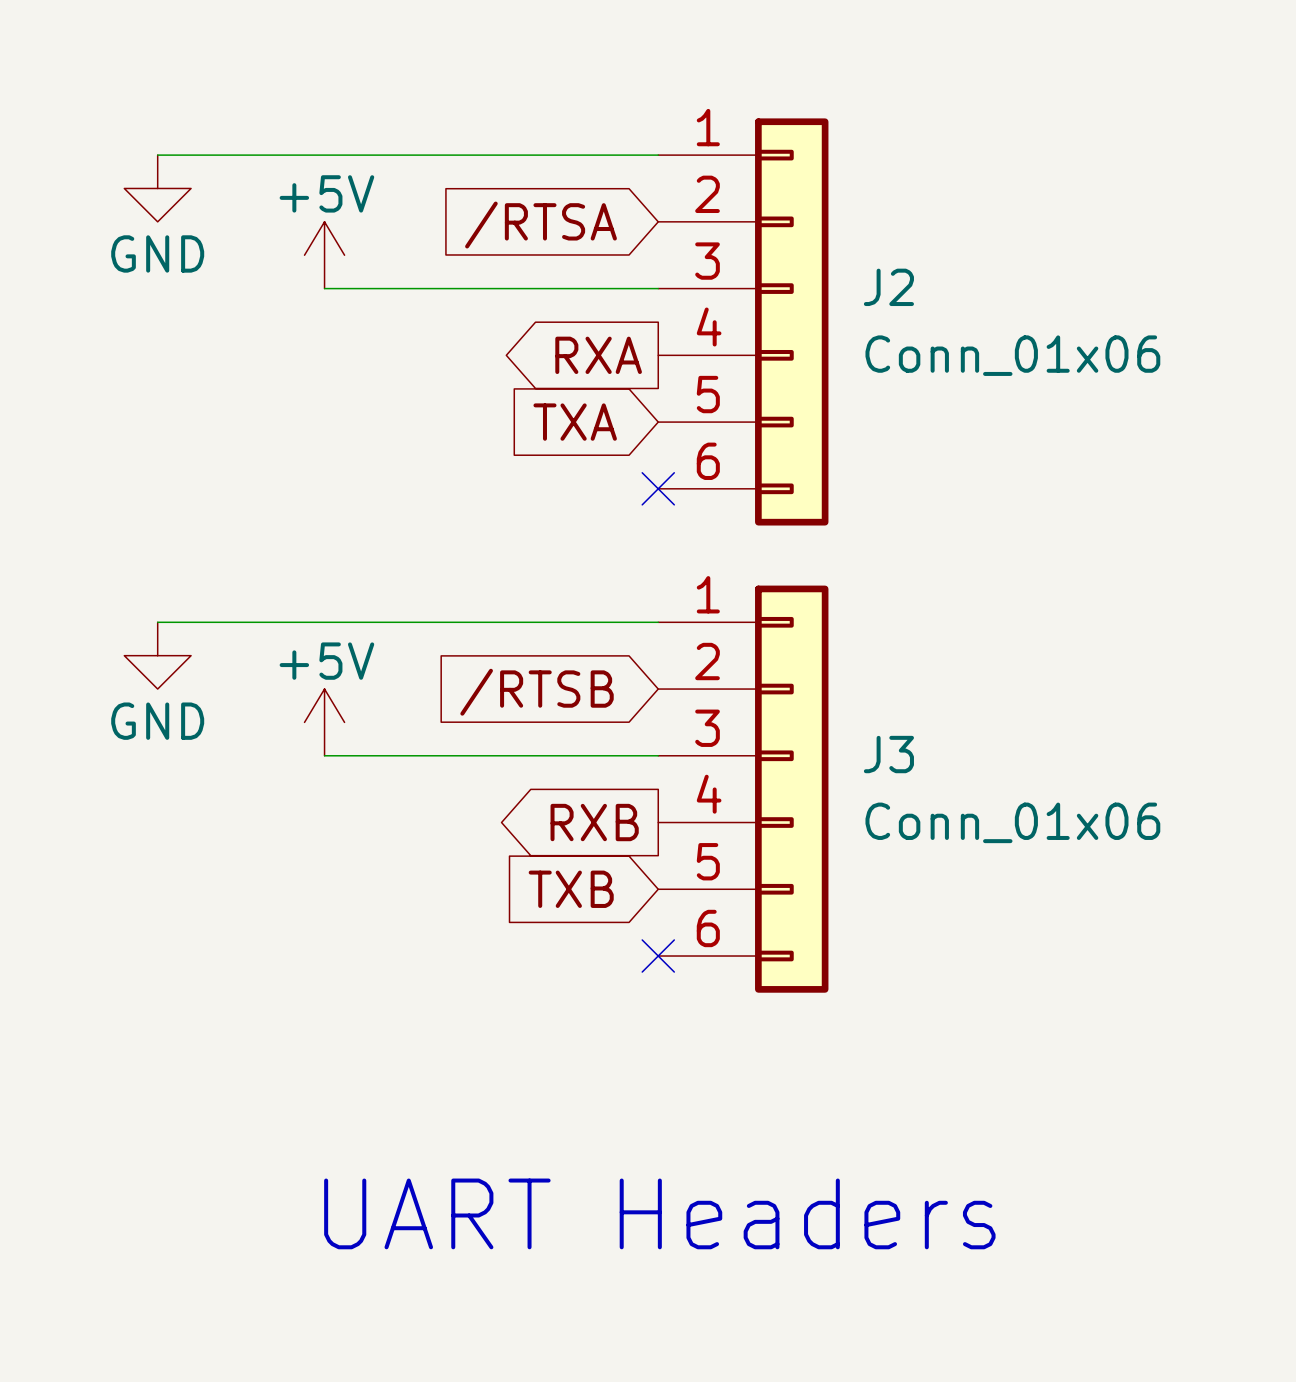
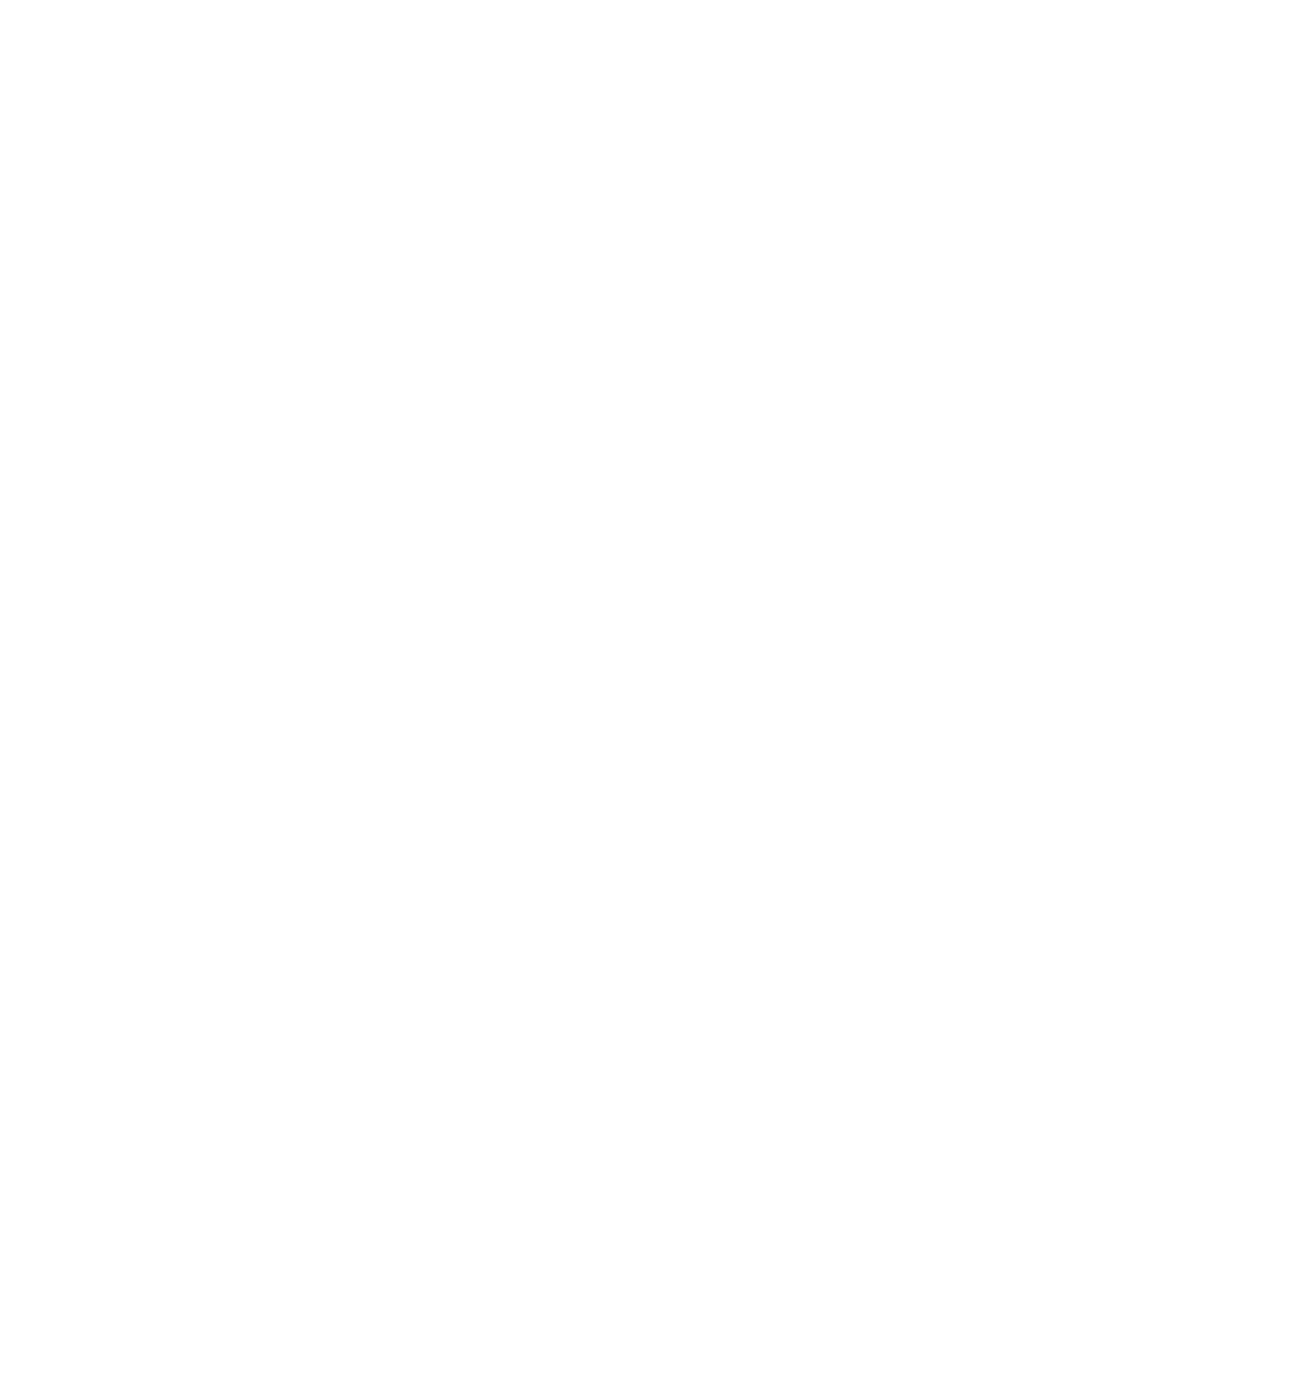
wire: (157, 155) (658, 155) -> none
power symbol: GND (157, 188) -> none
global label: /RTSA (541, 225) -> none
power symbol: +5V (324, 255) -> none
wire: (324, 288) (658, 288) -> none
J2: Conn_01x06 (743, 321) -> none
global label: RXA (598, 355) -> none
global label: TXA (575, 422) -> none
no-connect mark: (658, 488) -> none
wire: (157, 622) (658, 622) -> none
power symbol: GND (157, 655) -> none
global label: /RTSB (537, 692) -> none
power symbol: +5V (324, 722) -> none
wire: (324, 755) (658, 755) -> none
J3: Conn_01x06 (743, 789) -> none
global label: RXB (594, 822) -> none
global label: TXB (571, 889) -> none
no-connect mark: (658, 956) -> none
text: UART Headers (659, 1213) -> none

